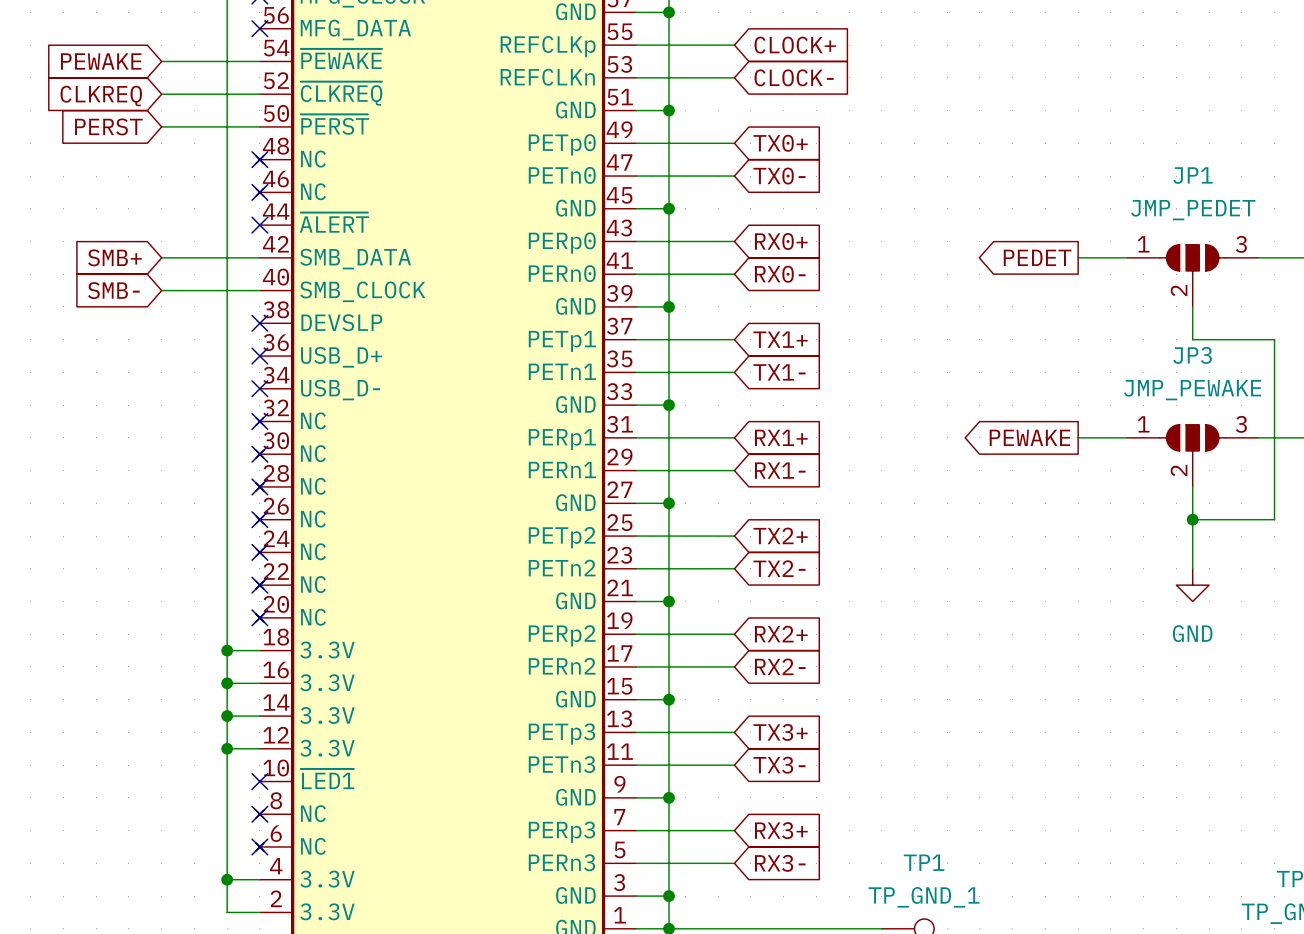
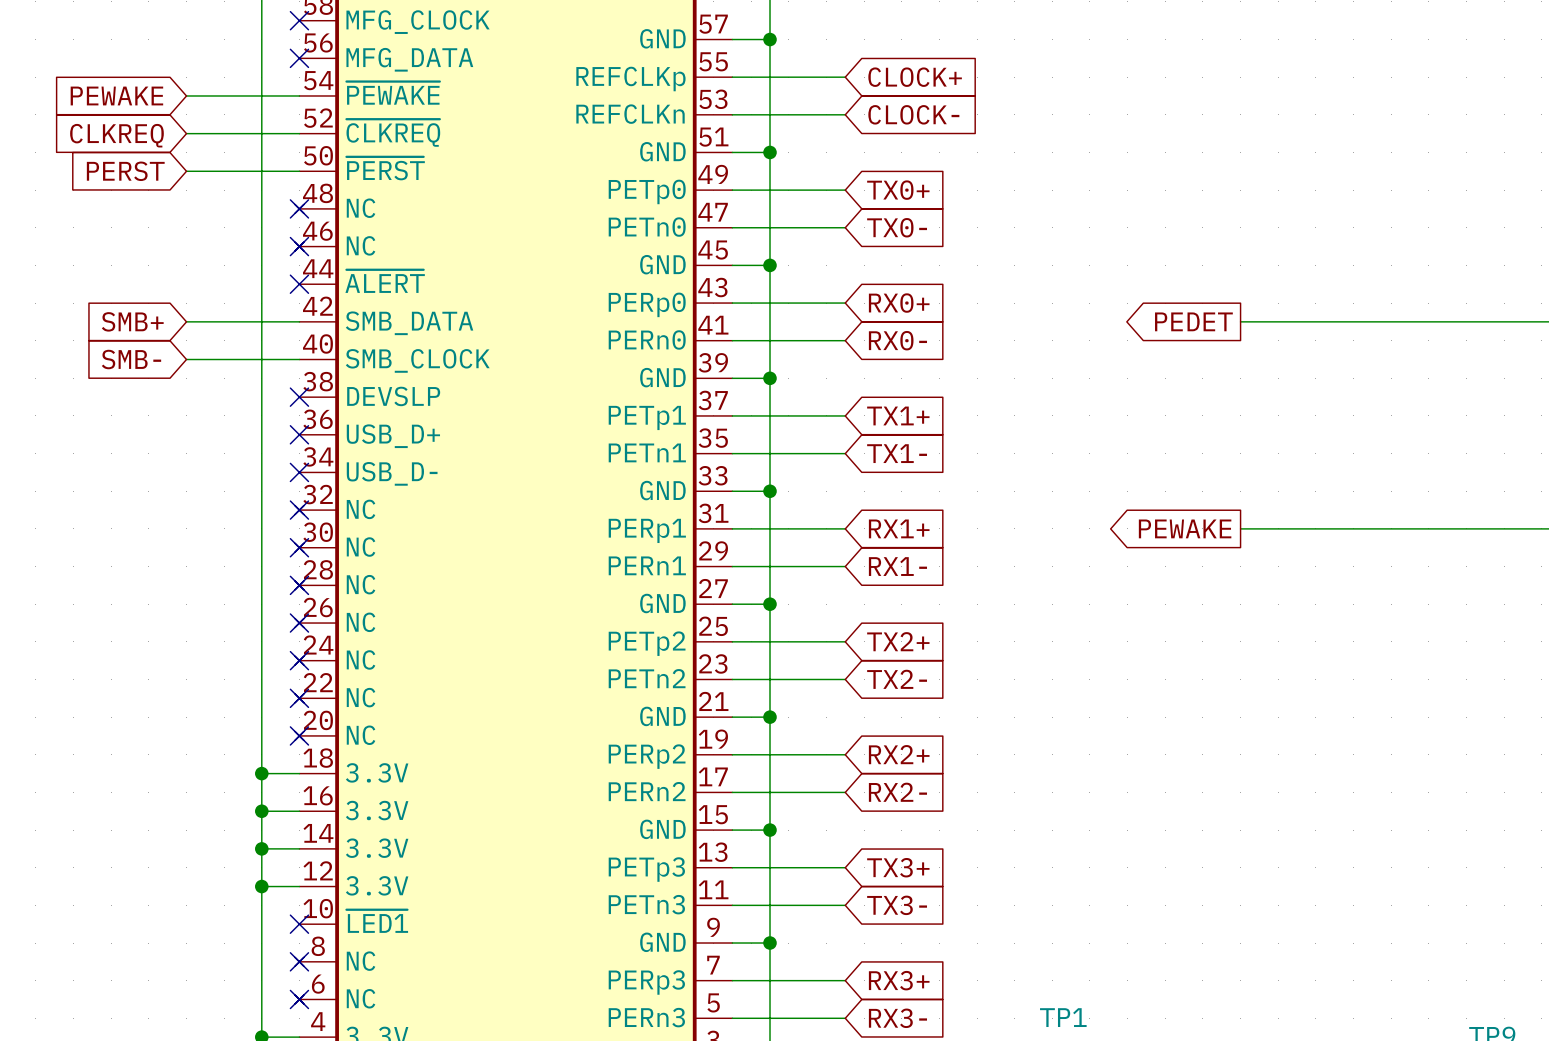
JP1: JMP_PEDET (1192, 275) -> none
wire: (1192, 306) (1192, 339) (1274, 339) (1274, 519) (1192, 519) -> none
JP3: JMP_PEWAKE (1192, 455) -> none
wire: (1192, 486) (1192, 568) -> none
junction: (1192, 519) -> none
power symbol: GND (1192, 585) -> none

